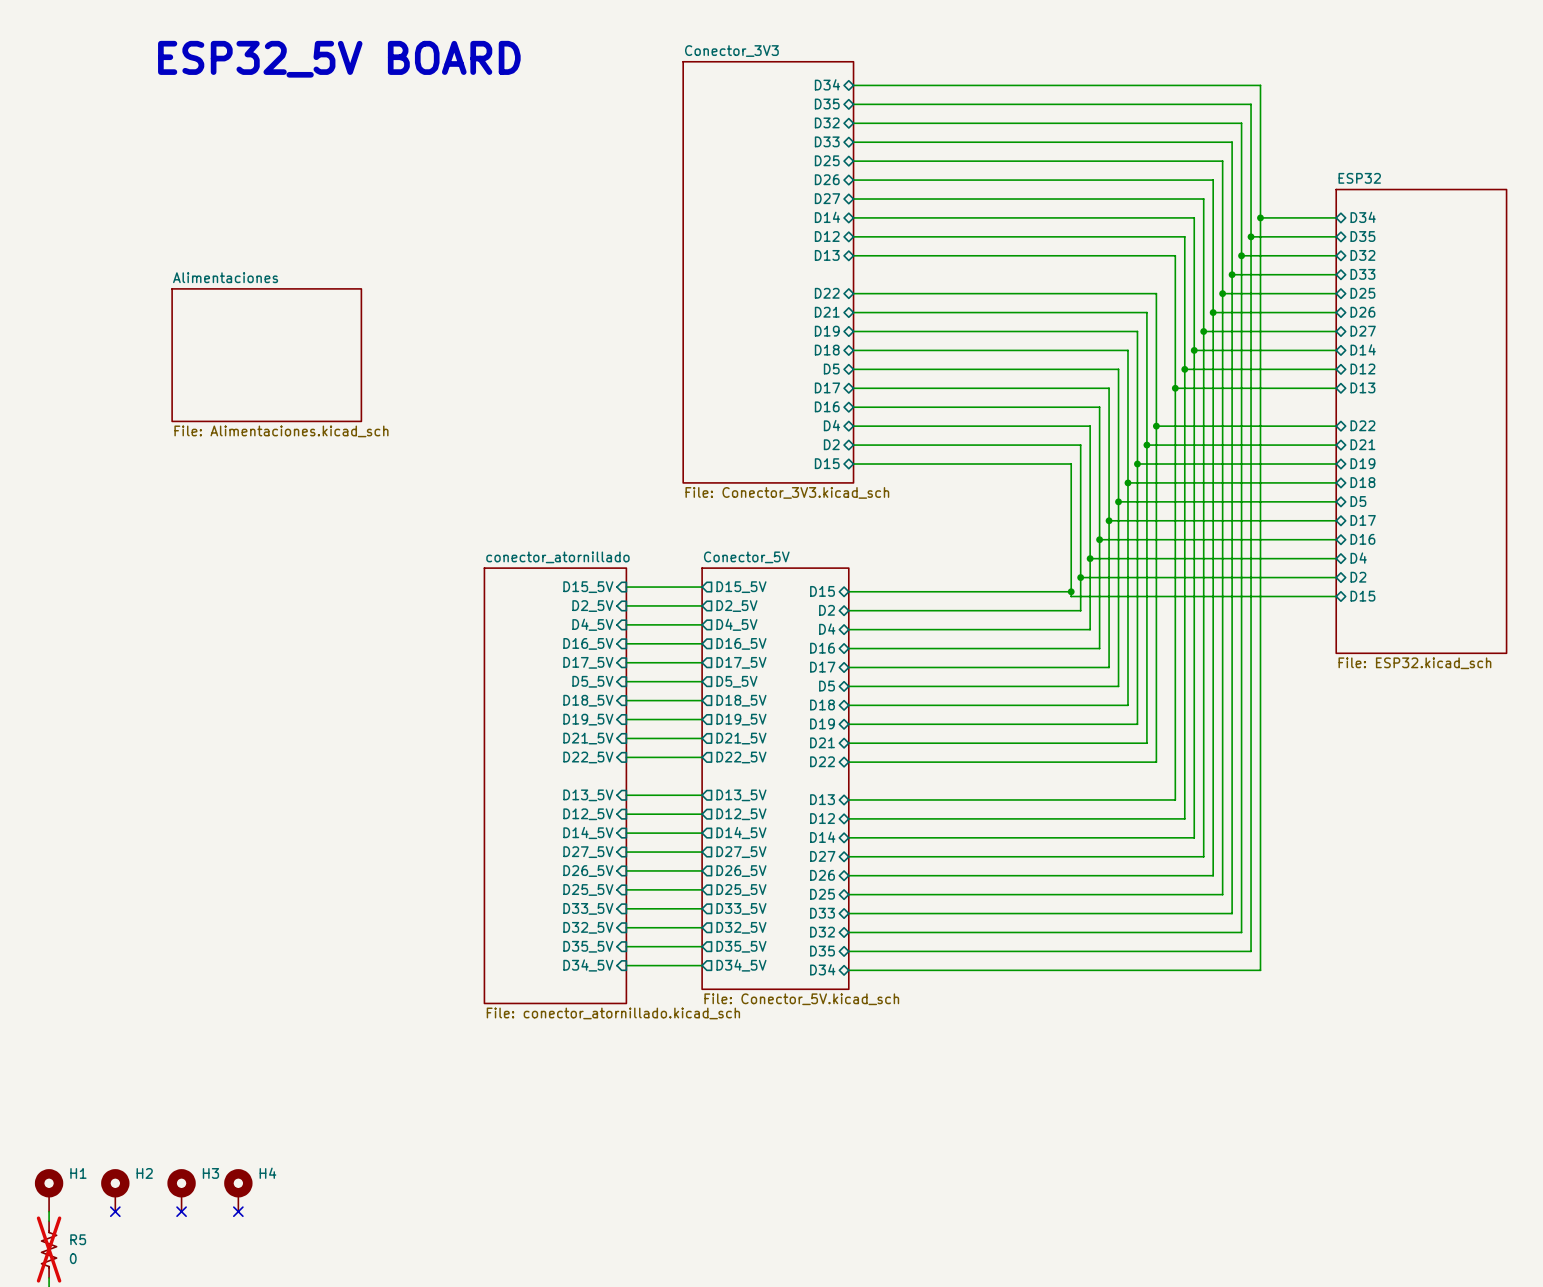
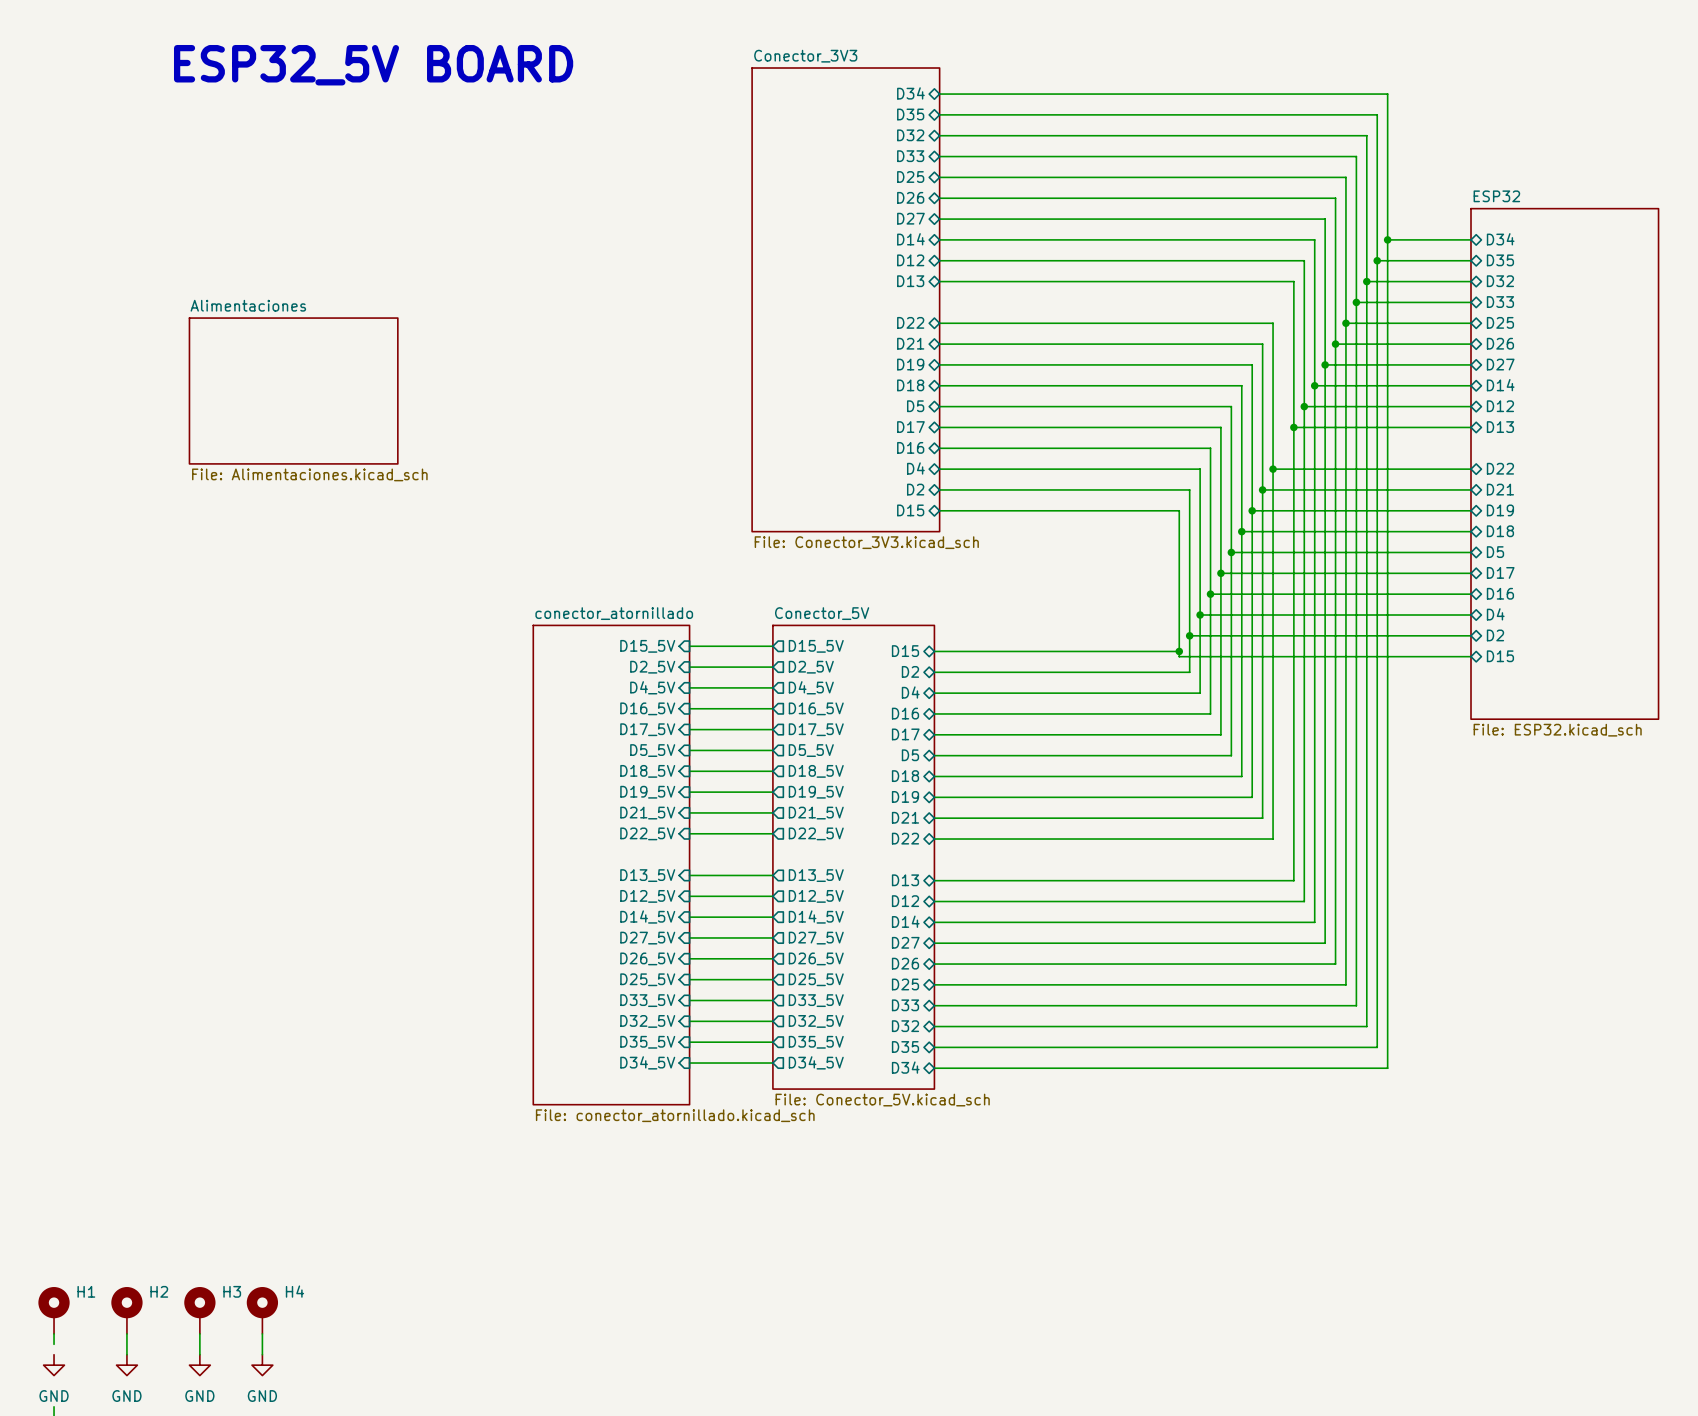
wire: none -> (126, 1333) (126, 1354)
no-connect mark: (115, 1211) -> none
wire: none -> (199, 1333) (199, 1354)
no-connect mark: (181, 1211) -> none
wire: none -> (262, 1333) (262, 1354)
no-connect mark: (238, 1211) -> none
power symbol: none -> GND (54, 1365)
power symbol: none -> GND (126, 1365)
power symbol: none -> GND (199, 1365)
power symbol: none -> GND (262, 1365)
R5: 0 (49, 1249) -> none

